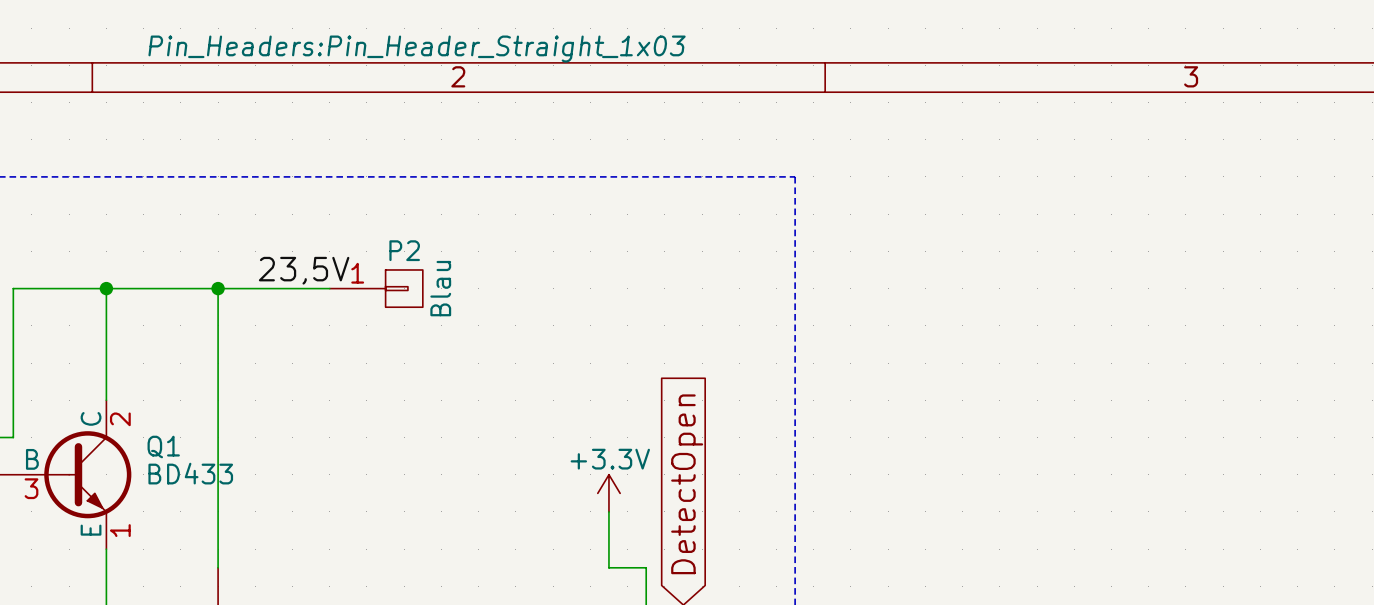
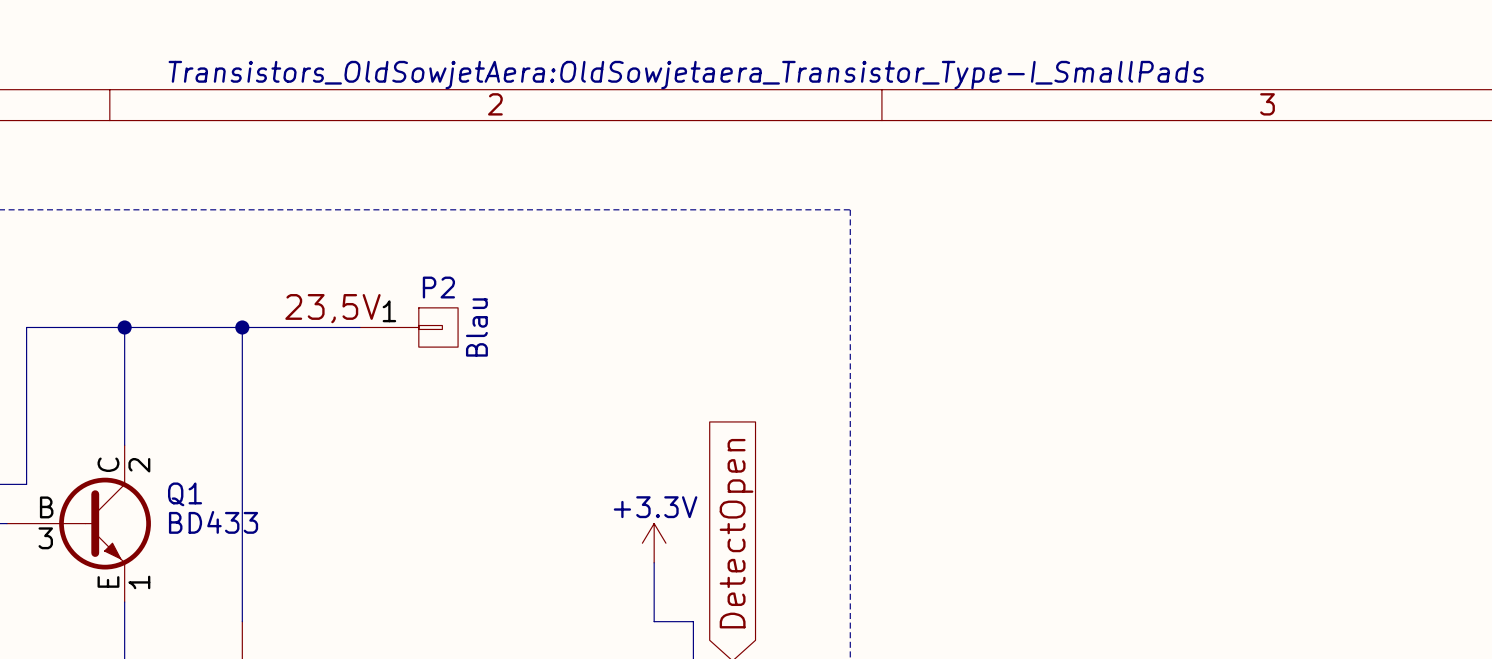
Q1 text: Pin_Headers:Pin_Header_Straight_1x03 (417, 49) -> Transistors_OldSowjetAera:OldSowjetaera_Transistor_Type-I_SmallPads (686, 75)

